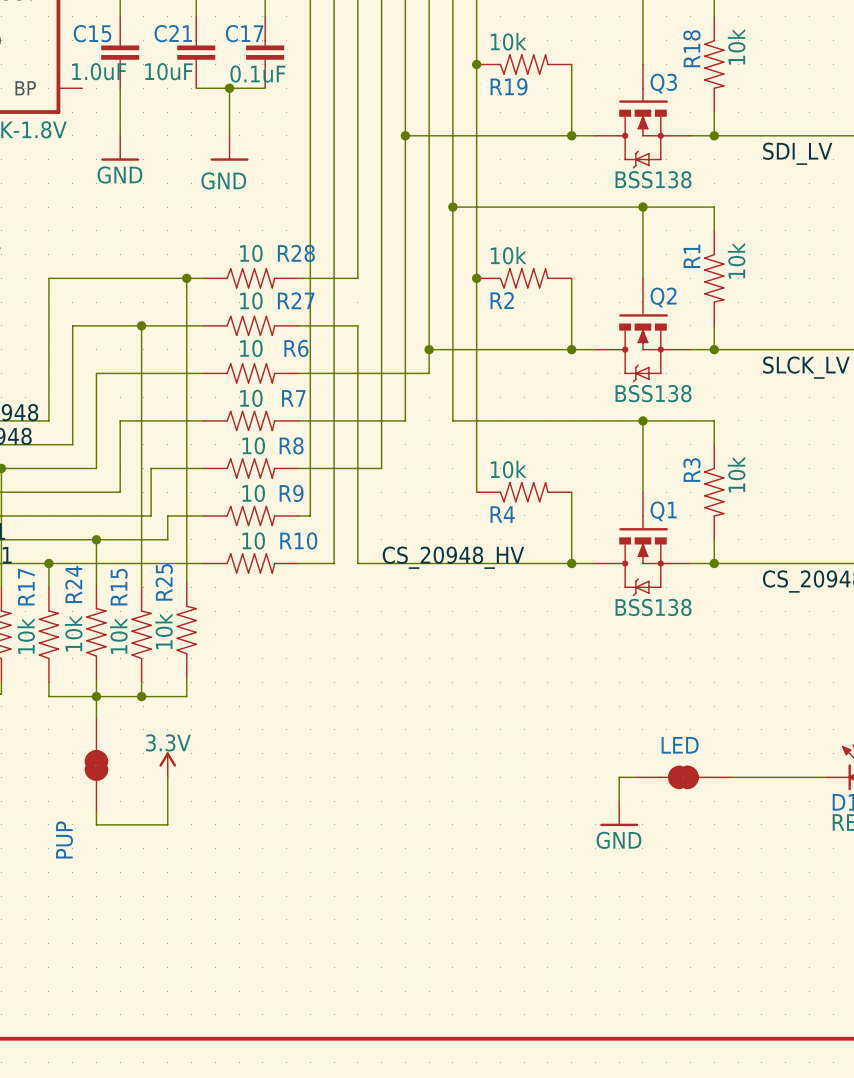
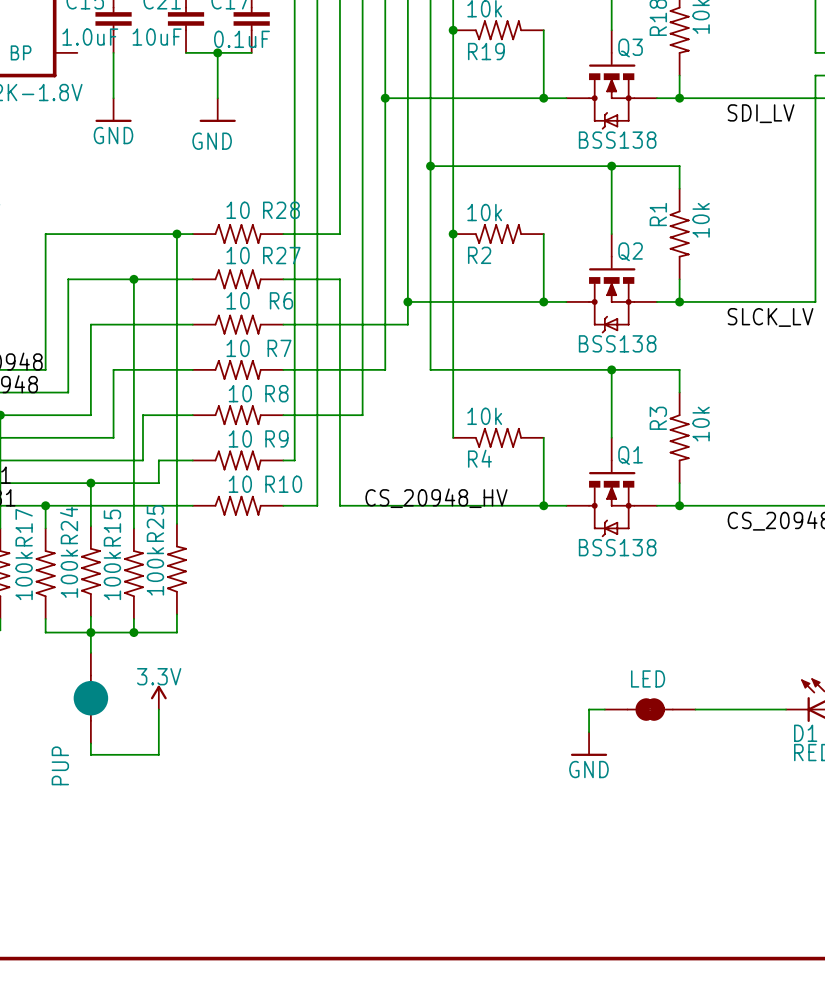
R25 value: 10k (163, 631) -> 100k (155, 571)
R24 value: 10k (73, 633) -> 100k (69, 573)
R17 value: 10k (26, 636) -> 100k (24, 575)
R15 value: 10k (118, 636) -> 100k (112, 575)
PUP symbol: [84, 717, 109, 814] -> [73, 652, 109, 744]

